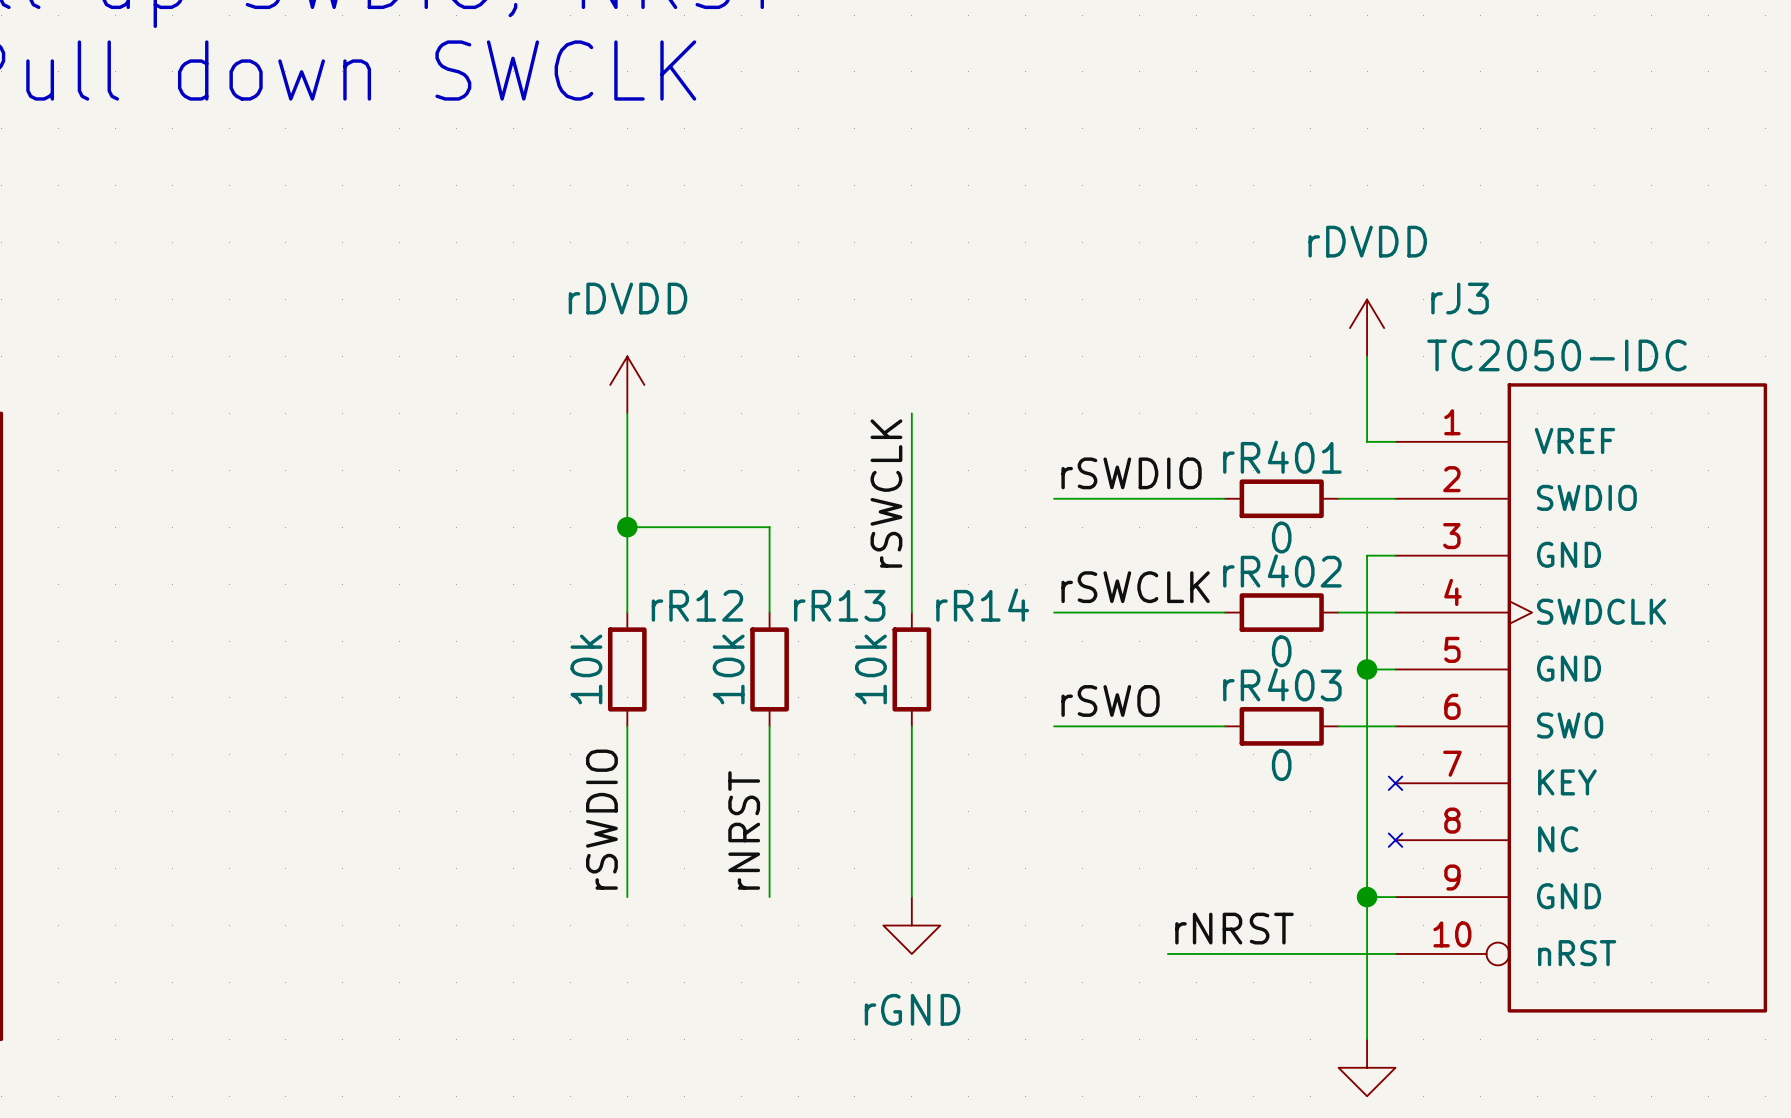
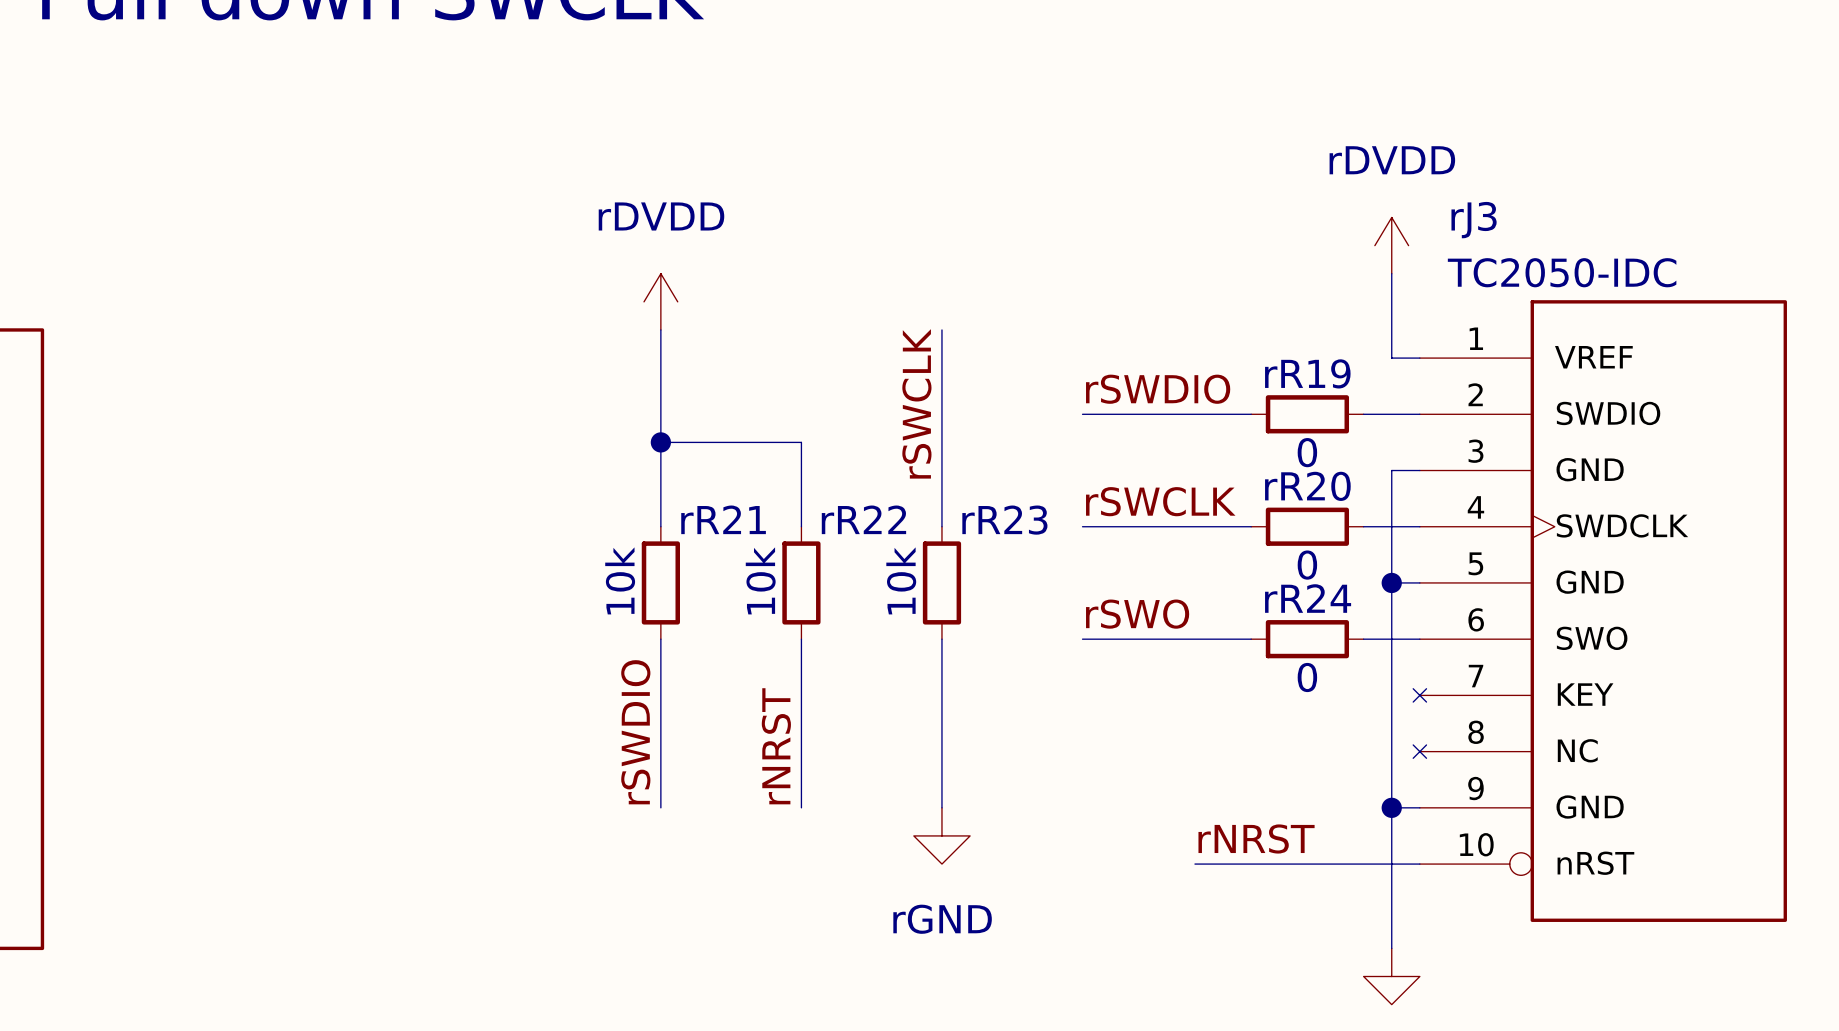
rR401 name: rR401 (1282, 457) -> rR19 (1307, 373)
rR402 name: rR402 (1282, 570) -> rR20 (1307, 486)
rR12 name: rR12 (697, 605) -> rR21 (723, 519)
rR13 name: rR13 (839, 605) -> rR22 (863, 519)
rR14 name: rR14 (982, 605) -> rR23 (1004, 520)
rR403 name: rR403 (1282, 684) -> rR24 (1308, 598)

